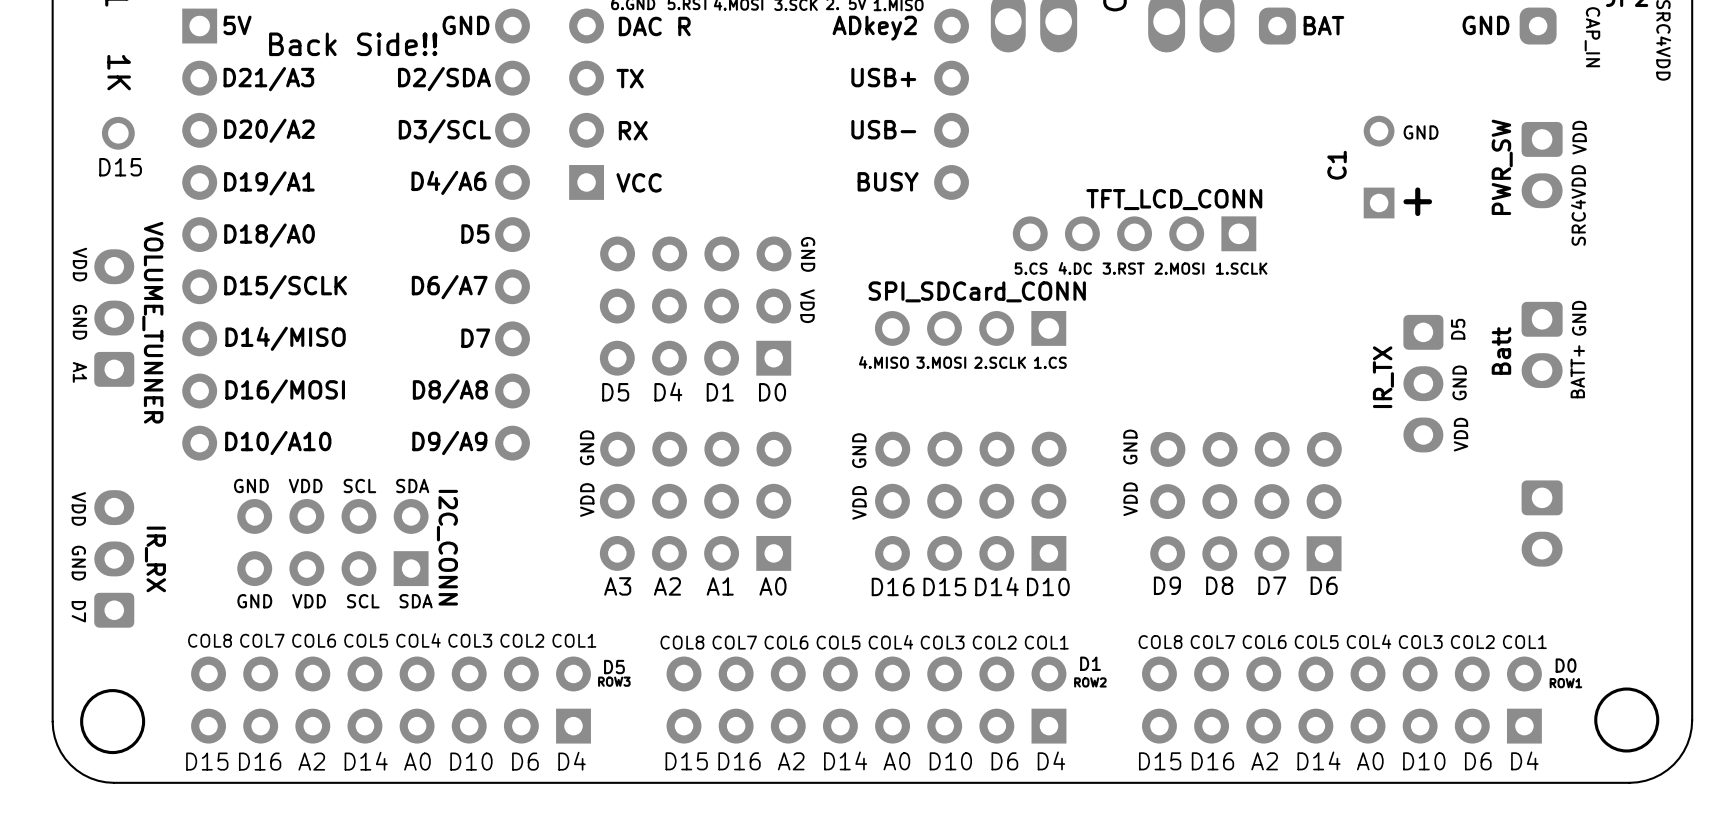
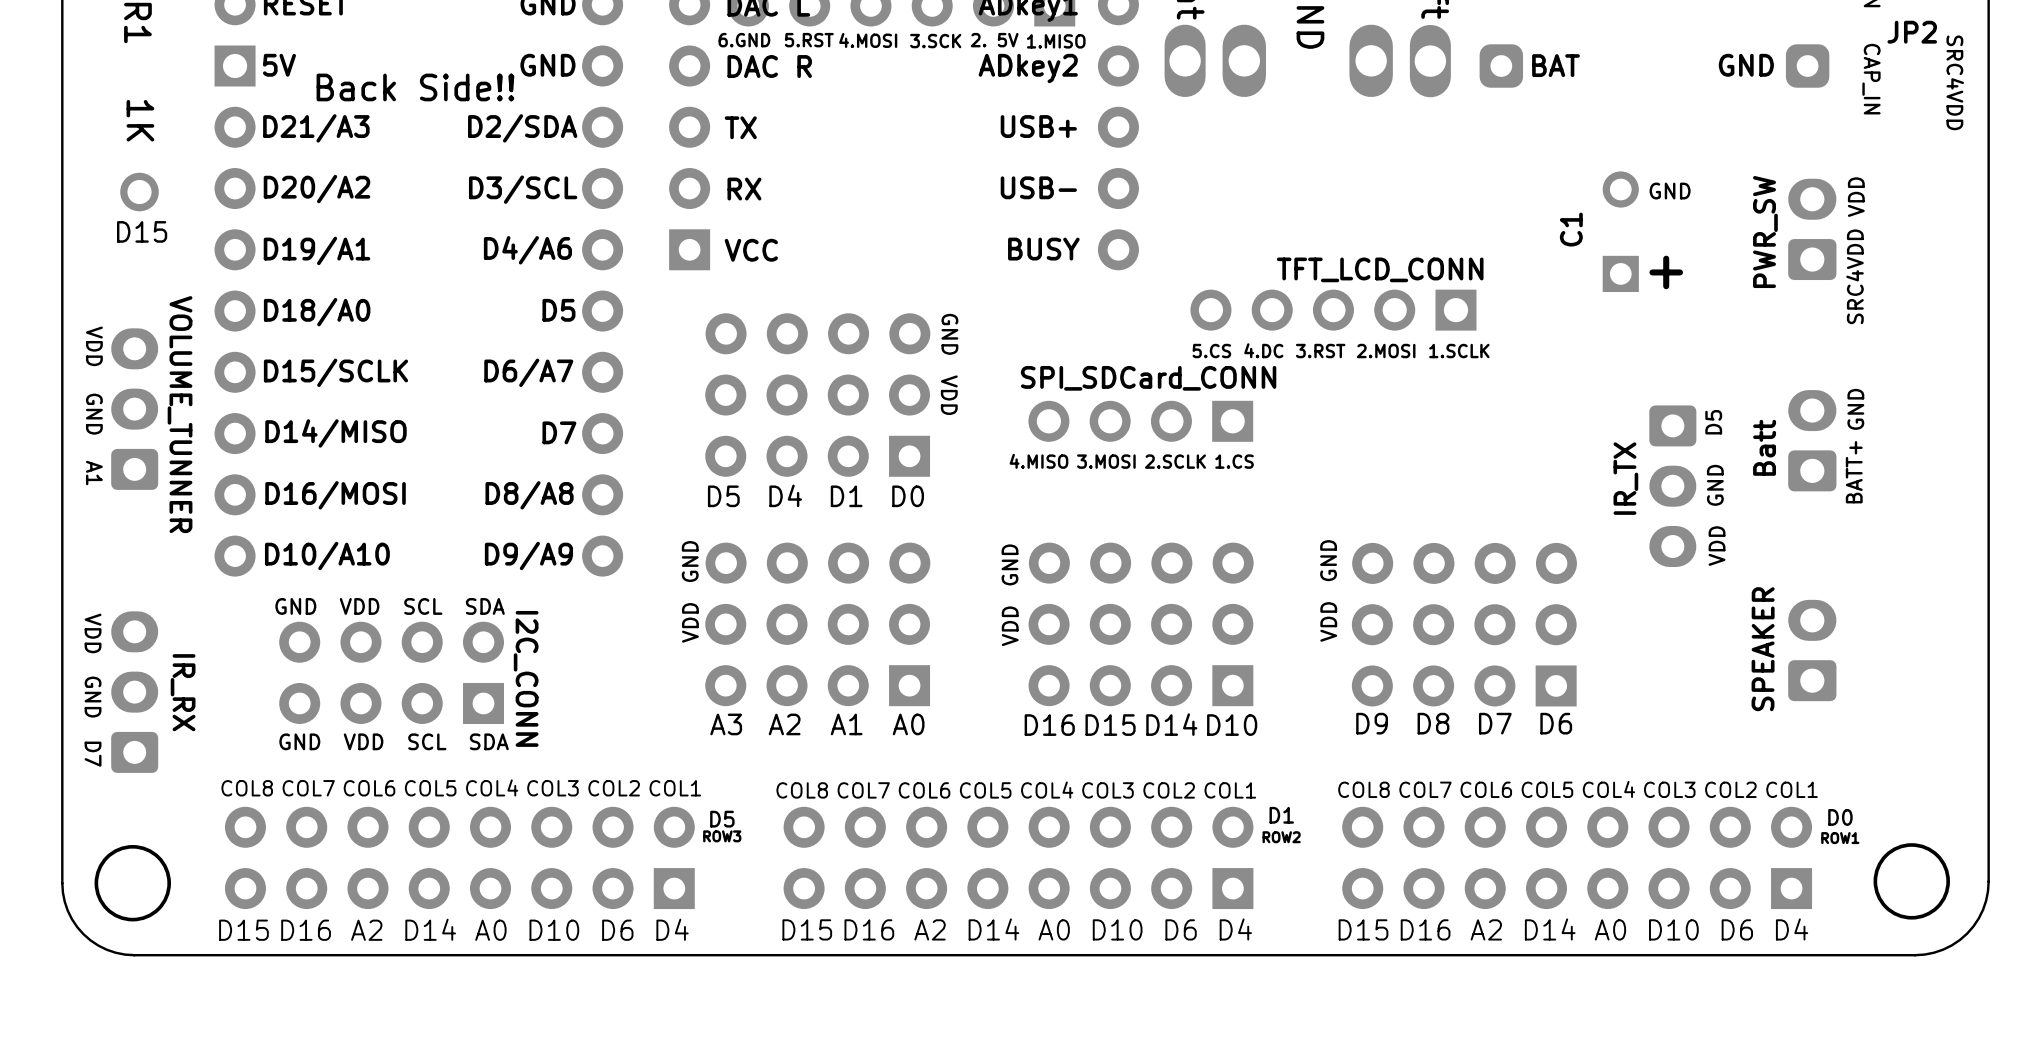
part rotation: 0° (1542, 165) -> 180° (1812, 229)
part rotation: 0° (1542, 344) -> 180° (1812, 440)
part value: none -> SPEAKER (1763, 649)
part rotation: 0° (1542, 523) -> 180° (1812, 650)

